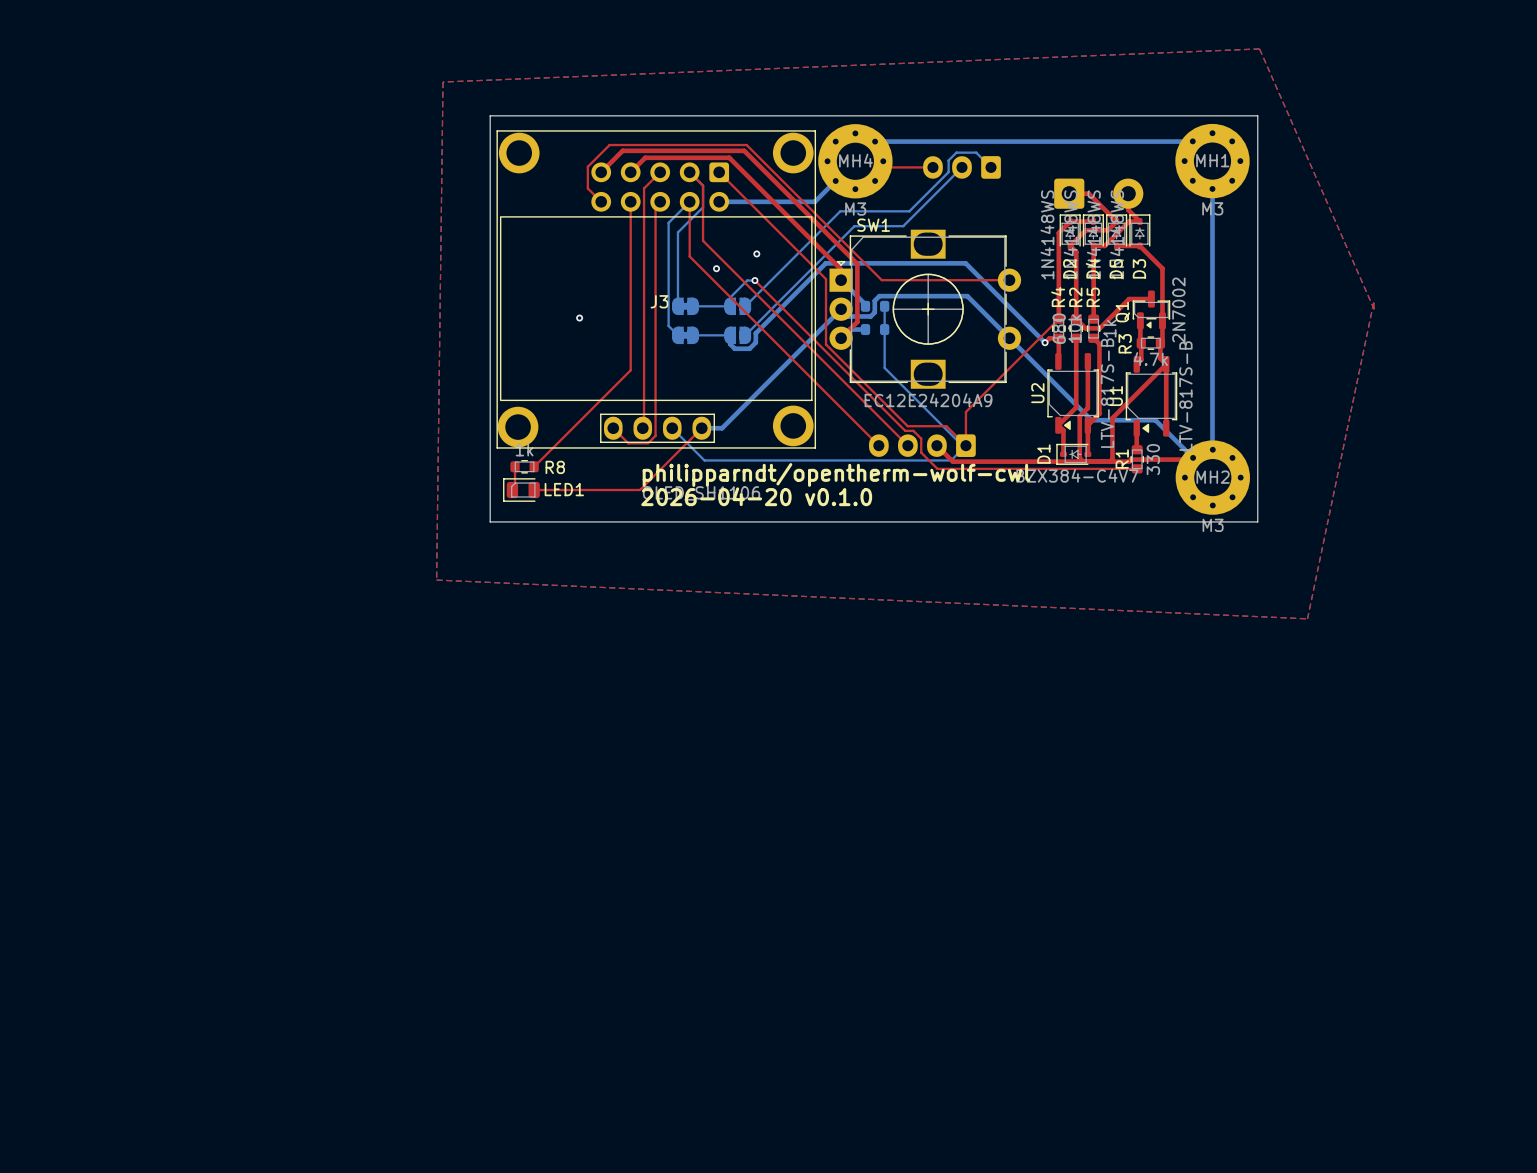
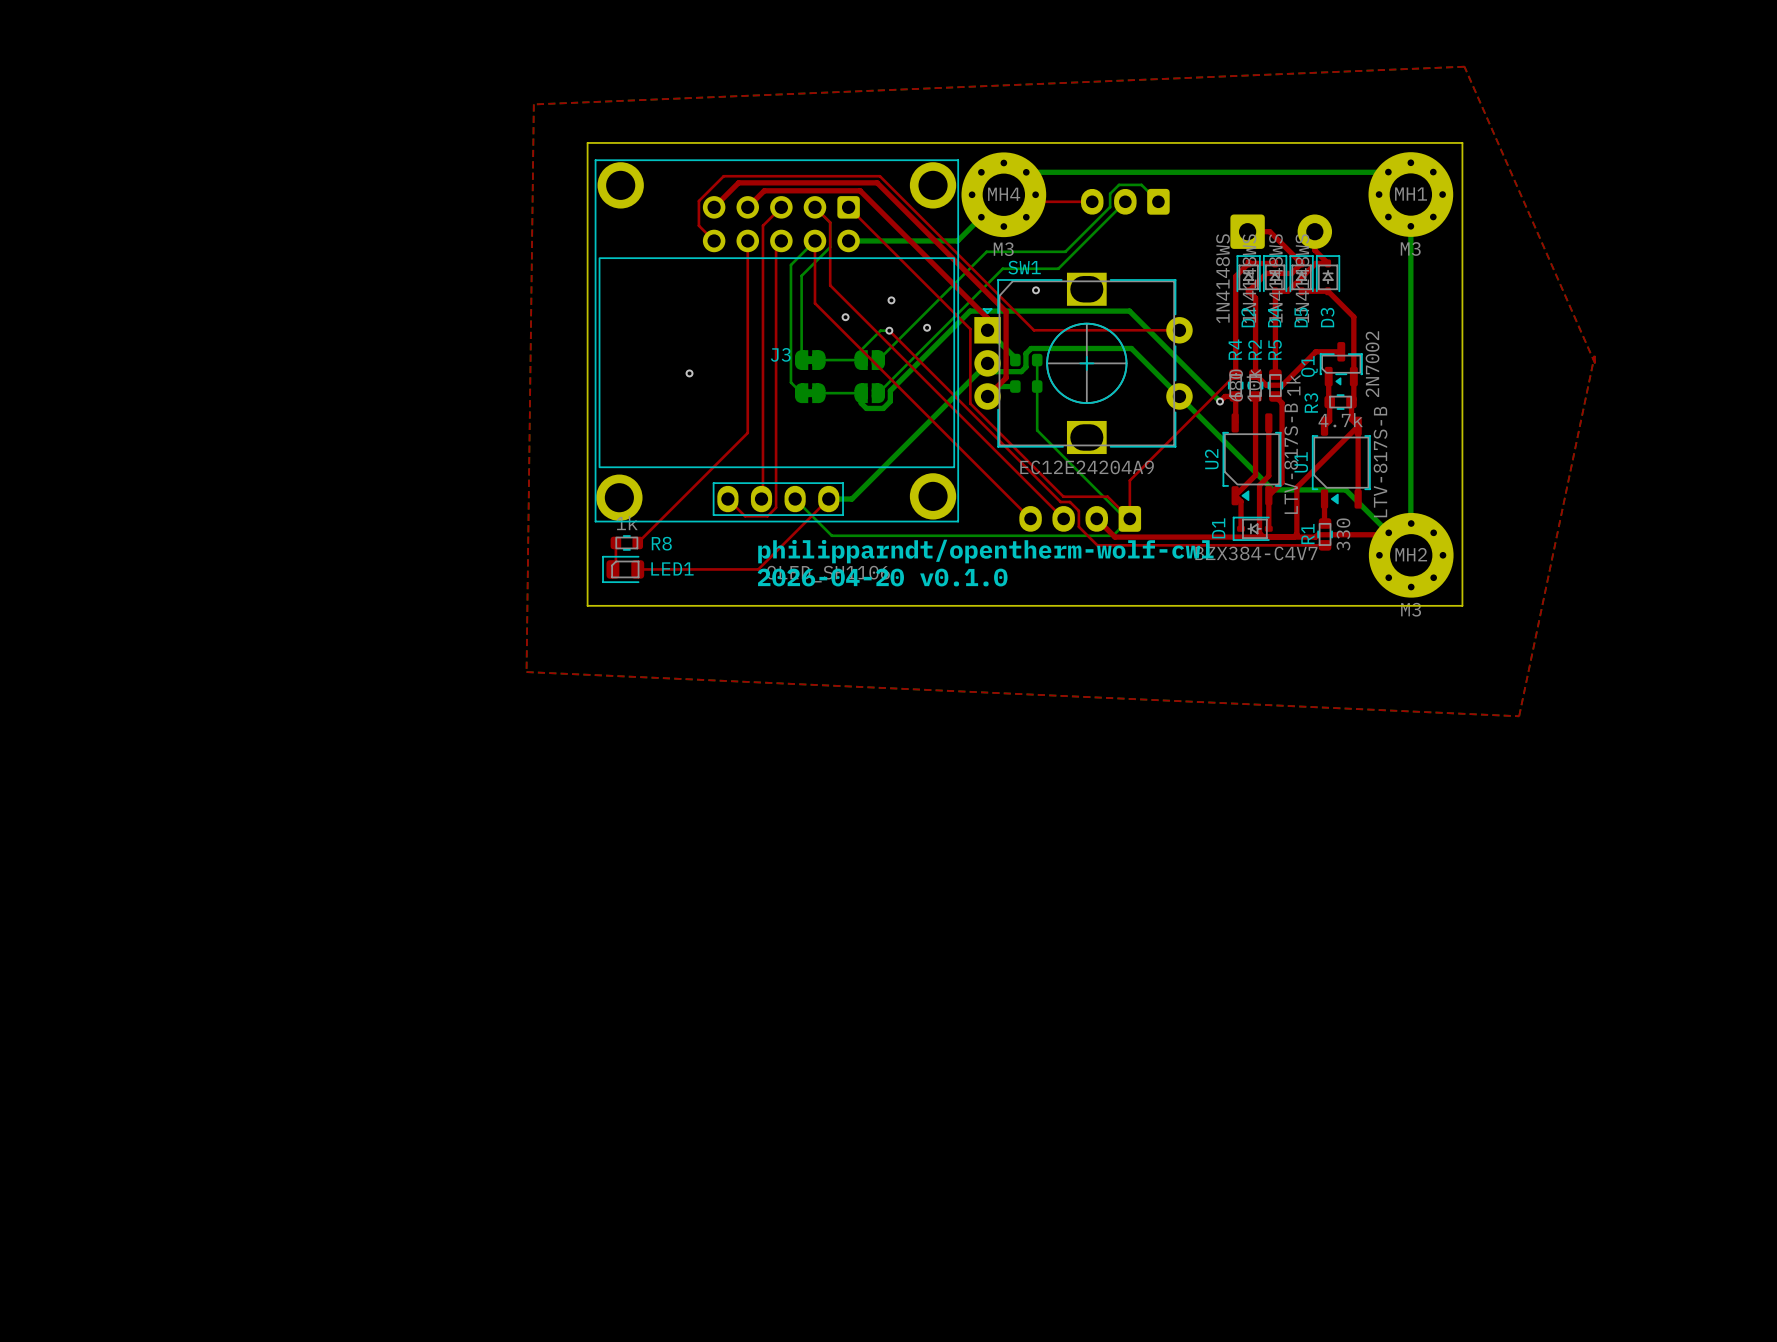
via: none -> (1036, 290)
via: none -> (927, 327)

